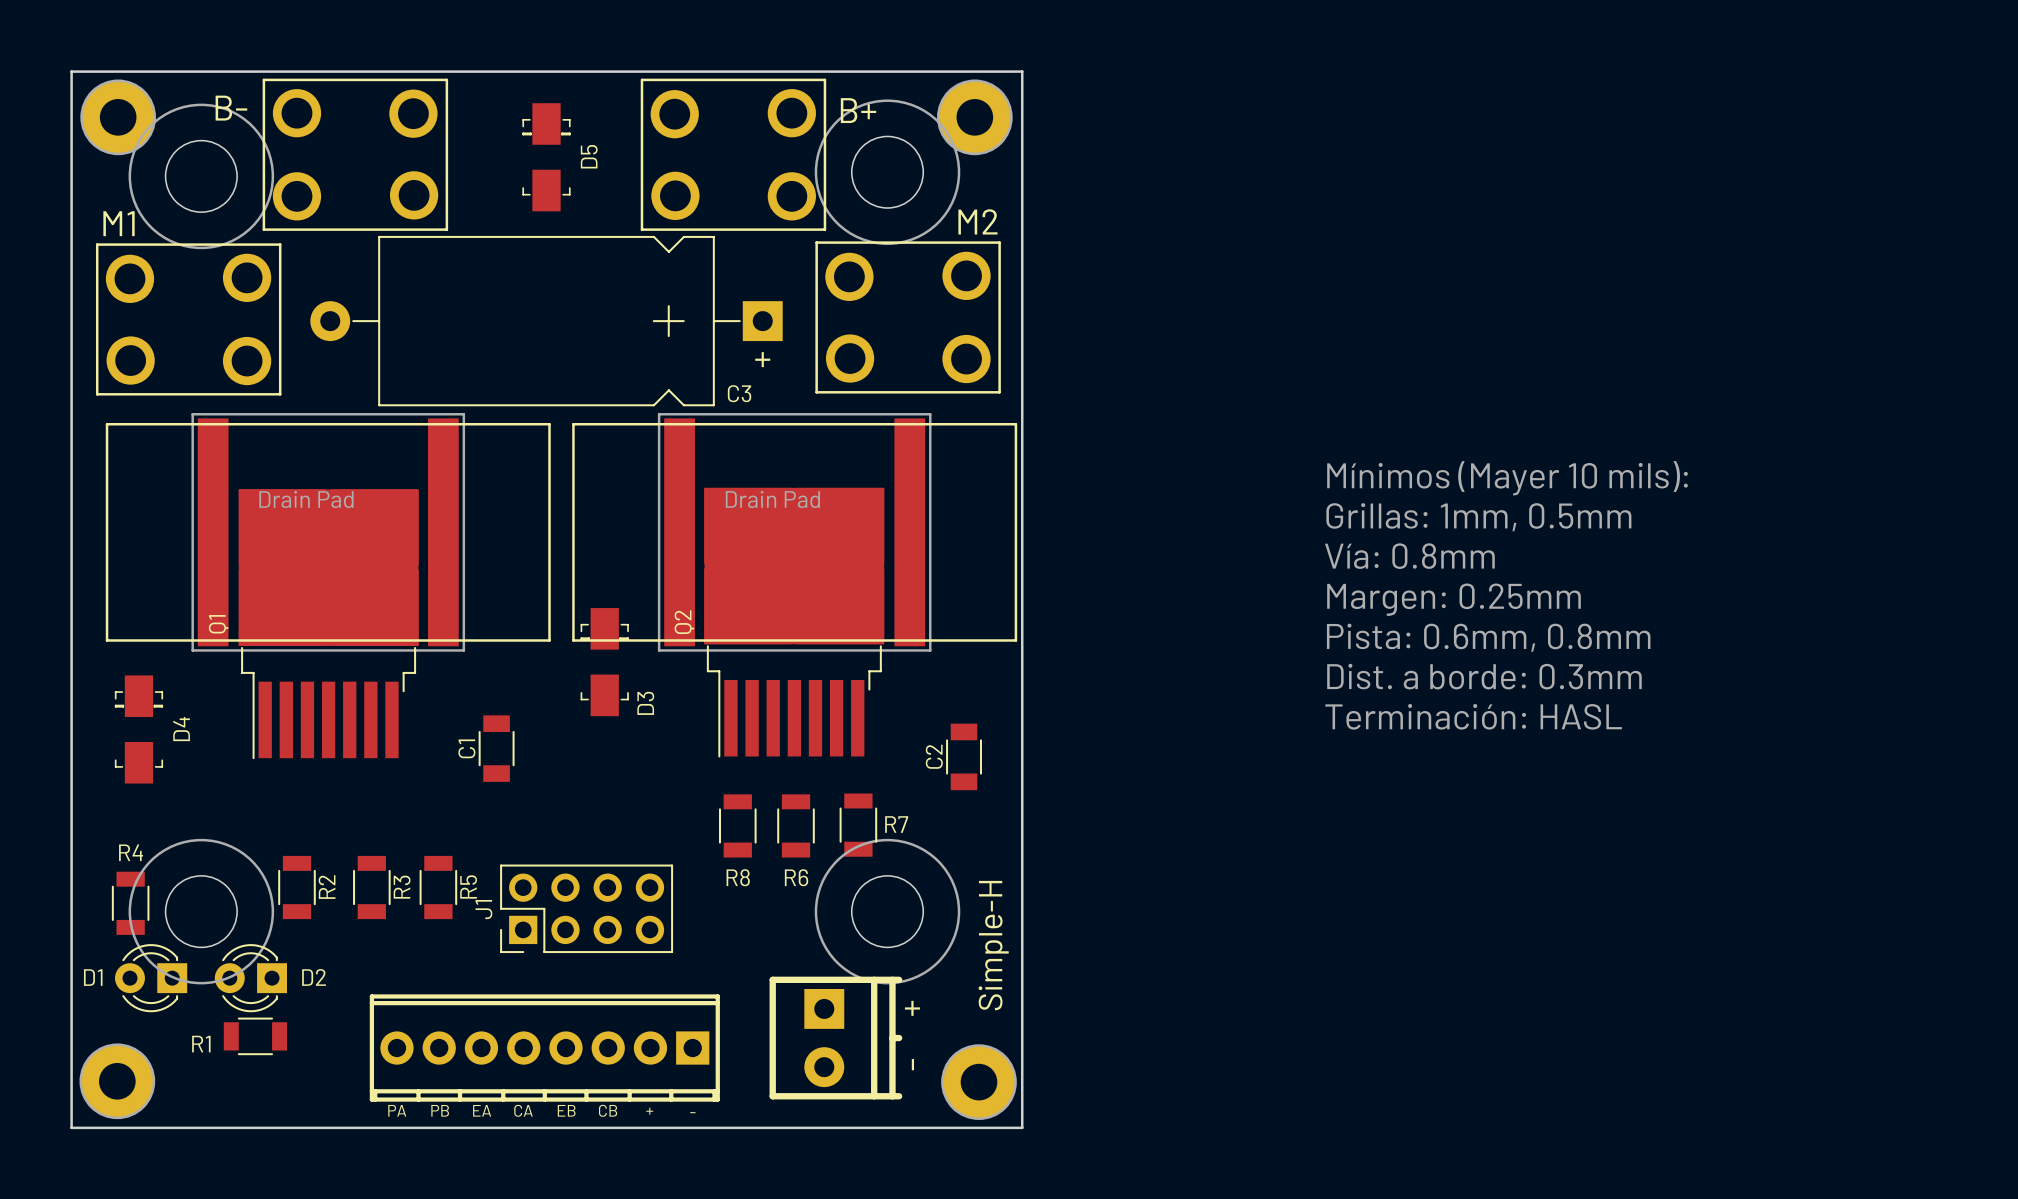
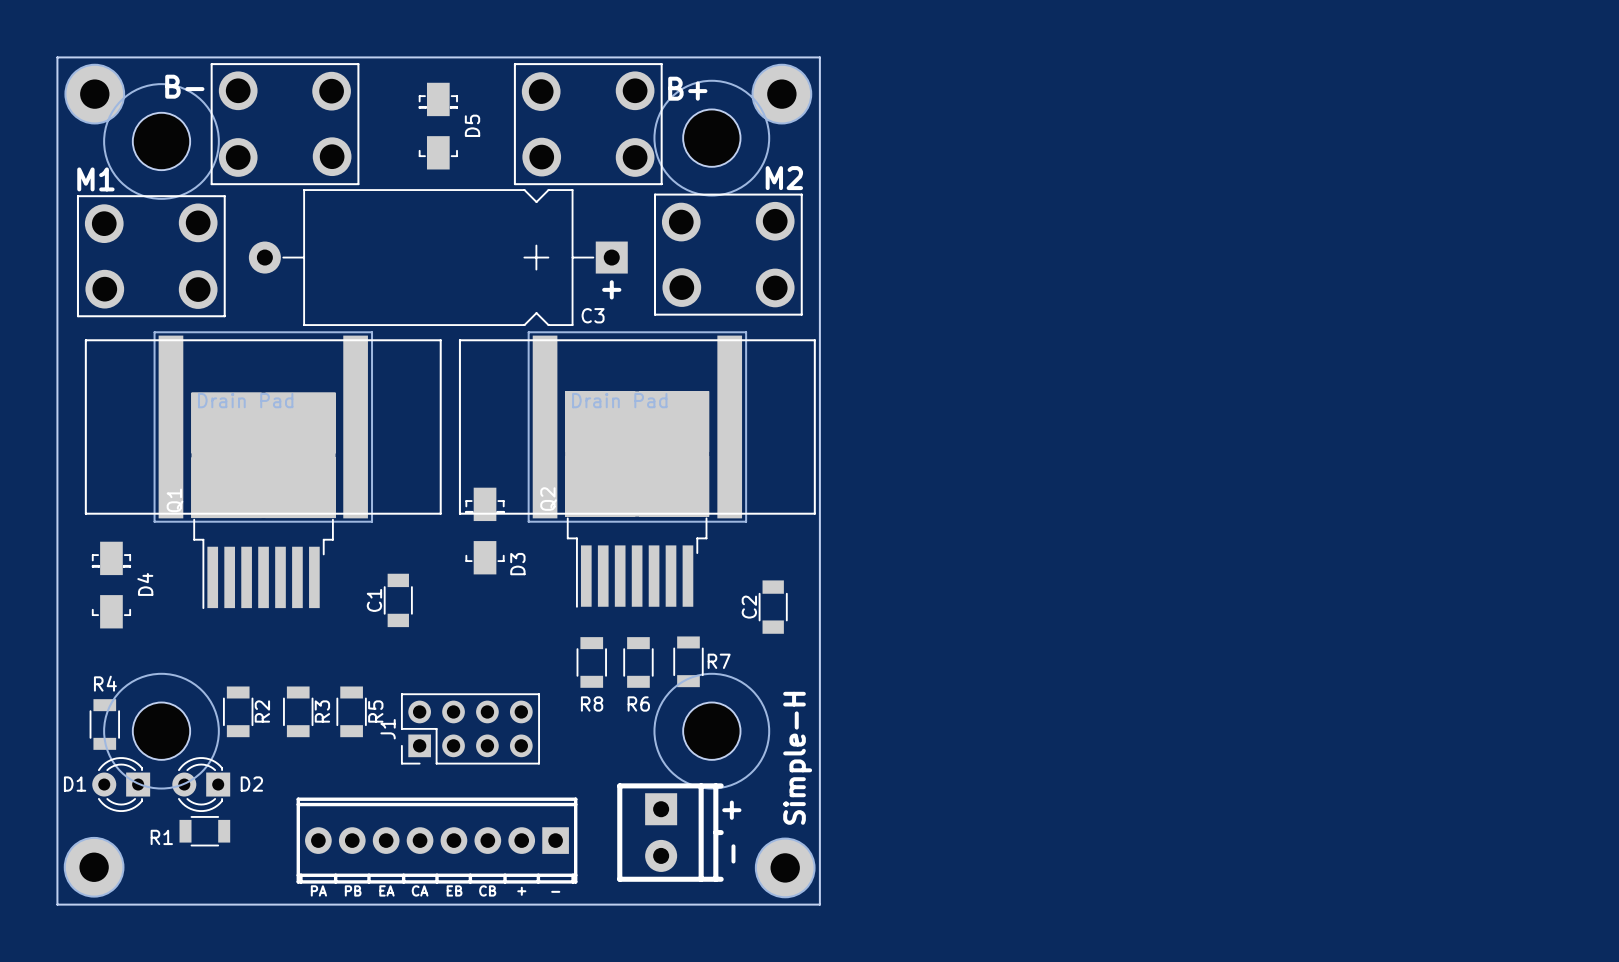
text: Mínimos (Mayer 10 mils): (1507, 478) -> none
text: Grillas: 1mm, 0.5mm (1478, 517) -> none
text: Vía: 0.8mm (1409, 556) -> none
text: Margen: 0.25mm (1453, 599) -> none
text: Pista: 0.6mm, 0.8mm (1488, 637) -> none
text: Dist. a borde: 0.3mm (1484, 676) -> none
text: Terminación: HASL (1473, 716) -> none

